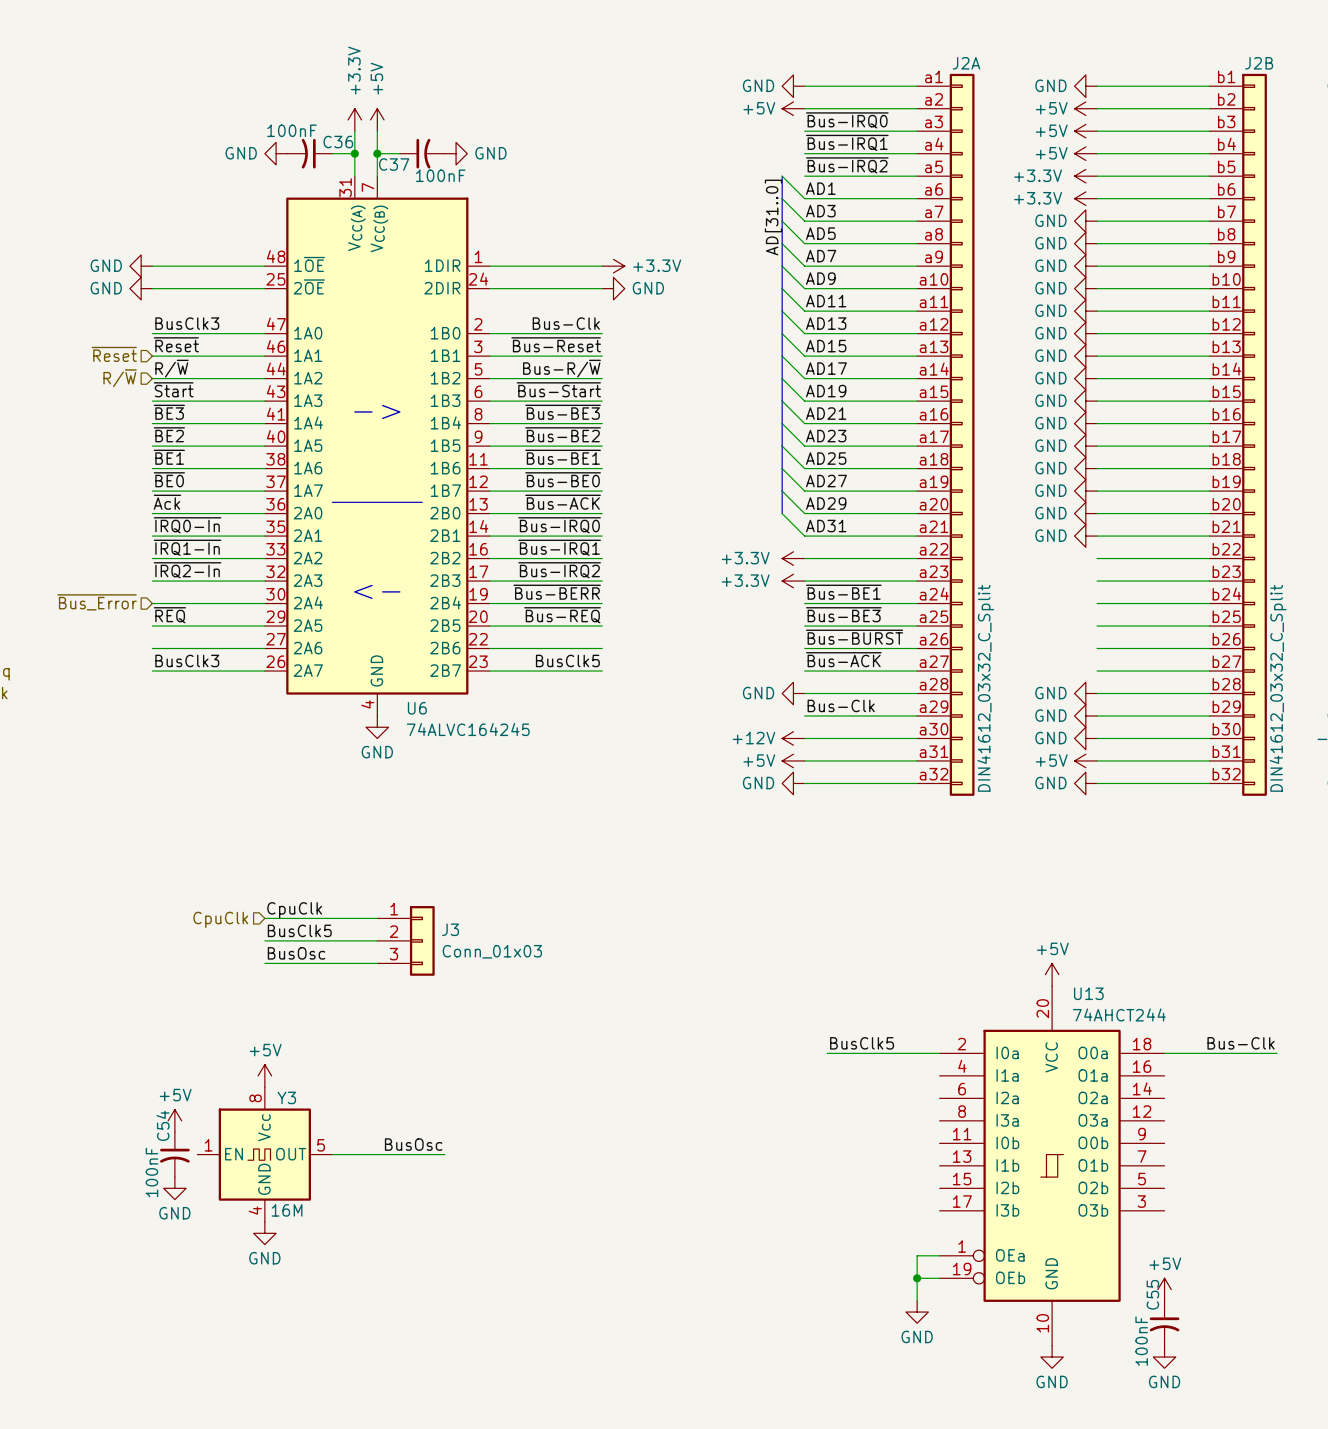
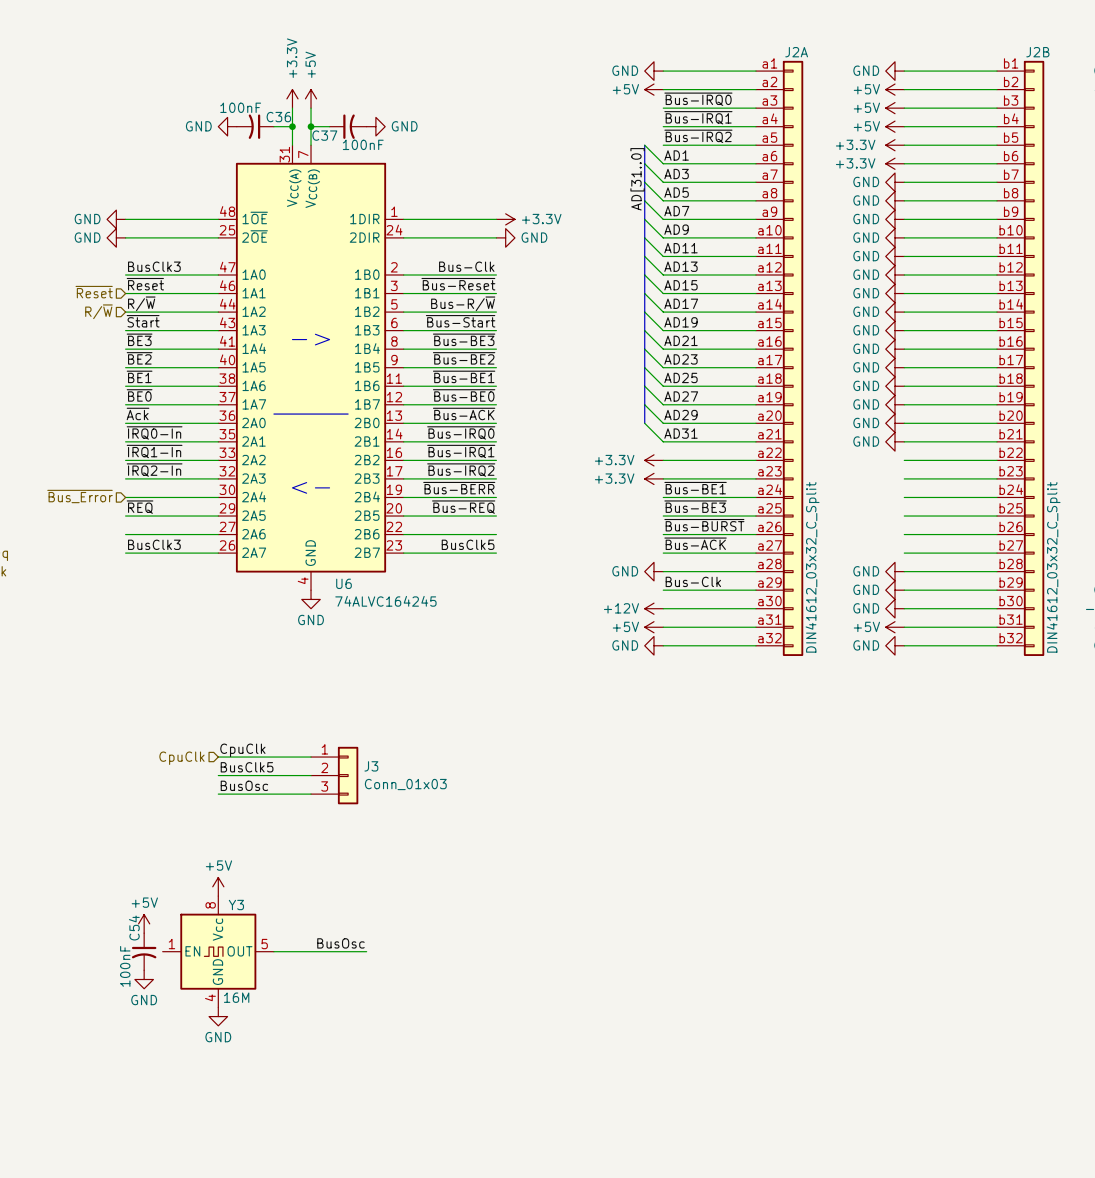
power symbol: +5V (1052, 974) -> none
label: BusClk5 (862, 1043) -> none
label: Bus-Clk (1241, 1043) -> none
wire: (827, 1053) (939, 1053) -> none
wire: (1164, 1053) (1277, 1053) -> none
U13: 74AHCT244 (1052, 1165) -> none
wire: (939, 1255) (917, 1255) (917, 1300) -> none
wire: (917, 1278) (939, 1278) -> none
junction: (917, 1278) -> none
power symbol: +5V (1164, 1289) -> none
power symbol: GND (917, 1312) -> none
C55: 100nF (1164, 1323) -> none
power symbol: GND (1052, 1357) -> none
power symbol: GND (1164, 1357) -> none

